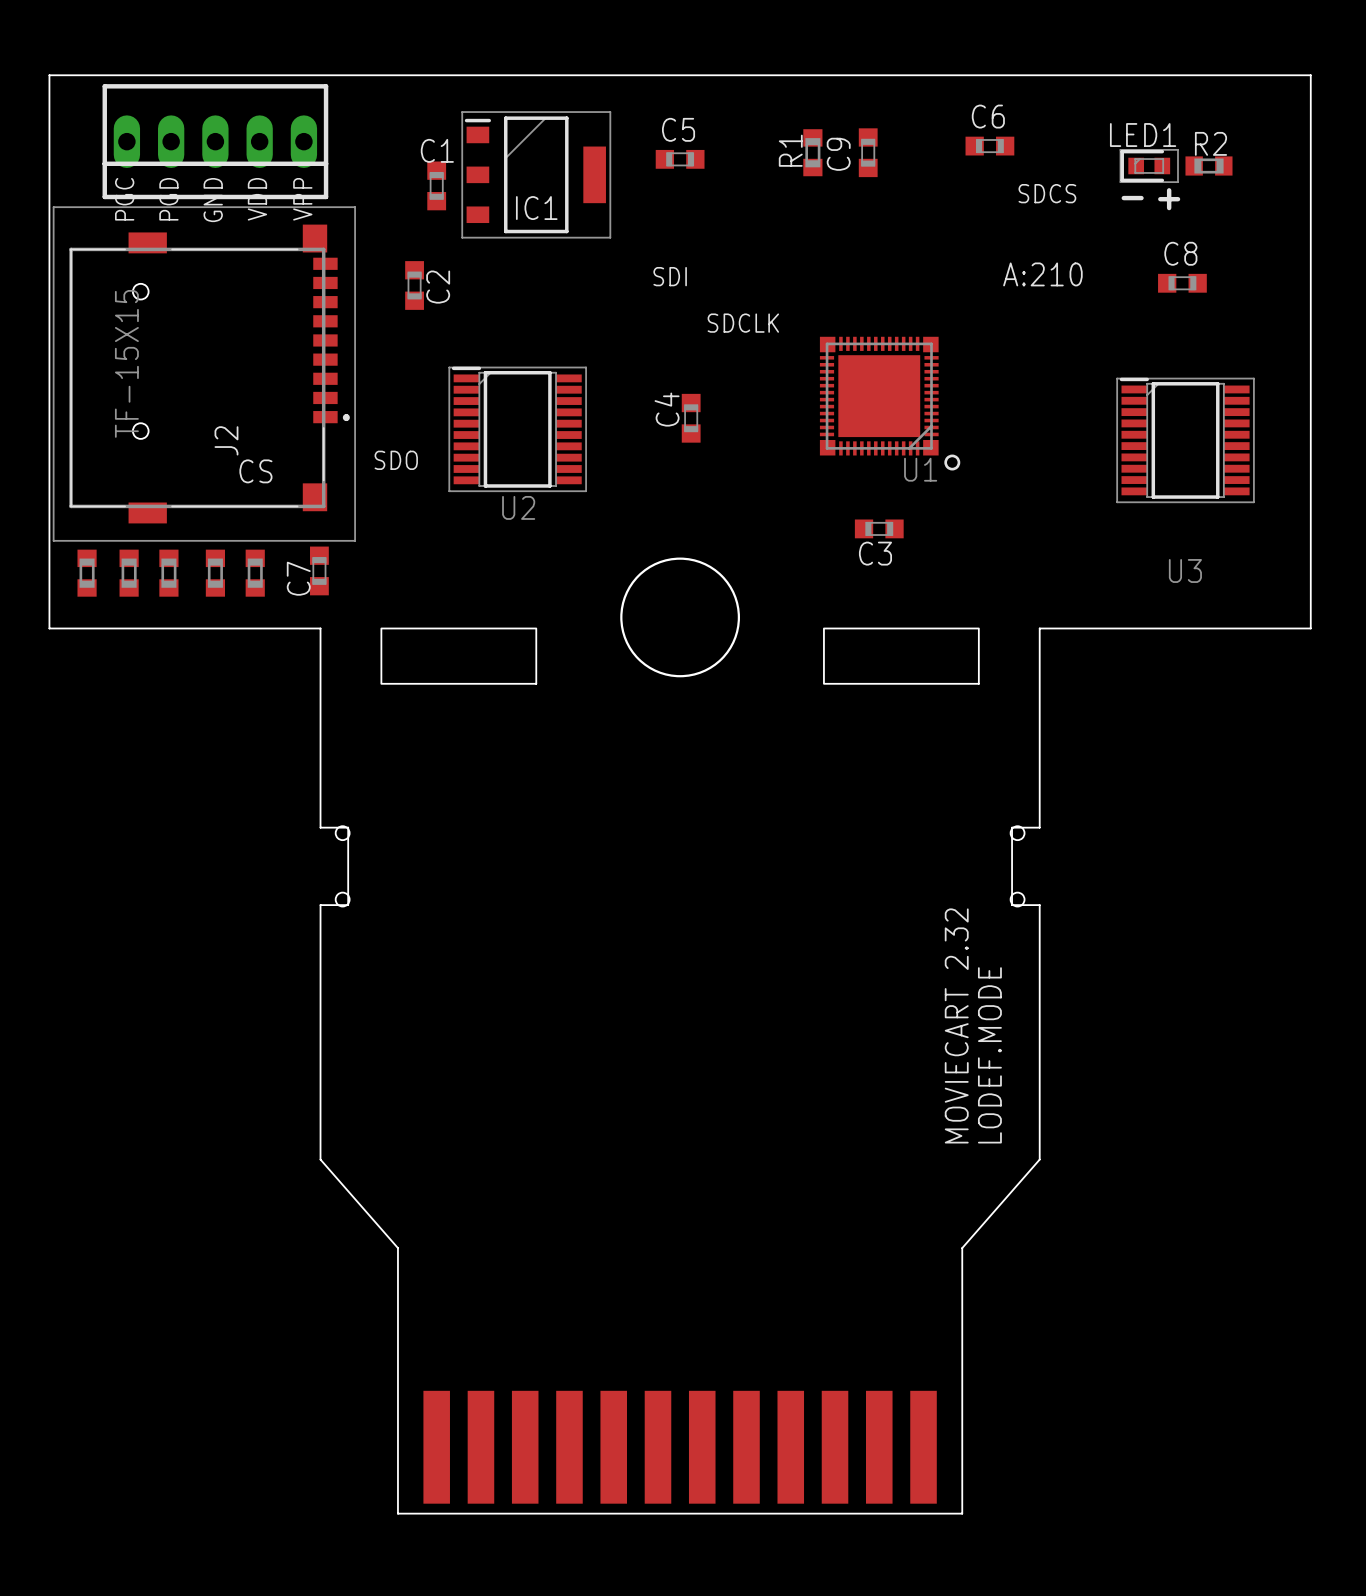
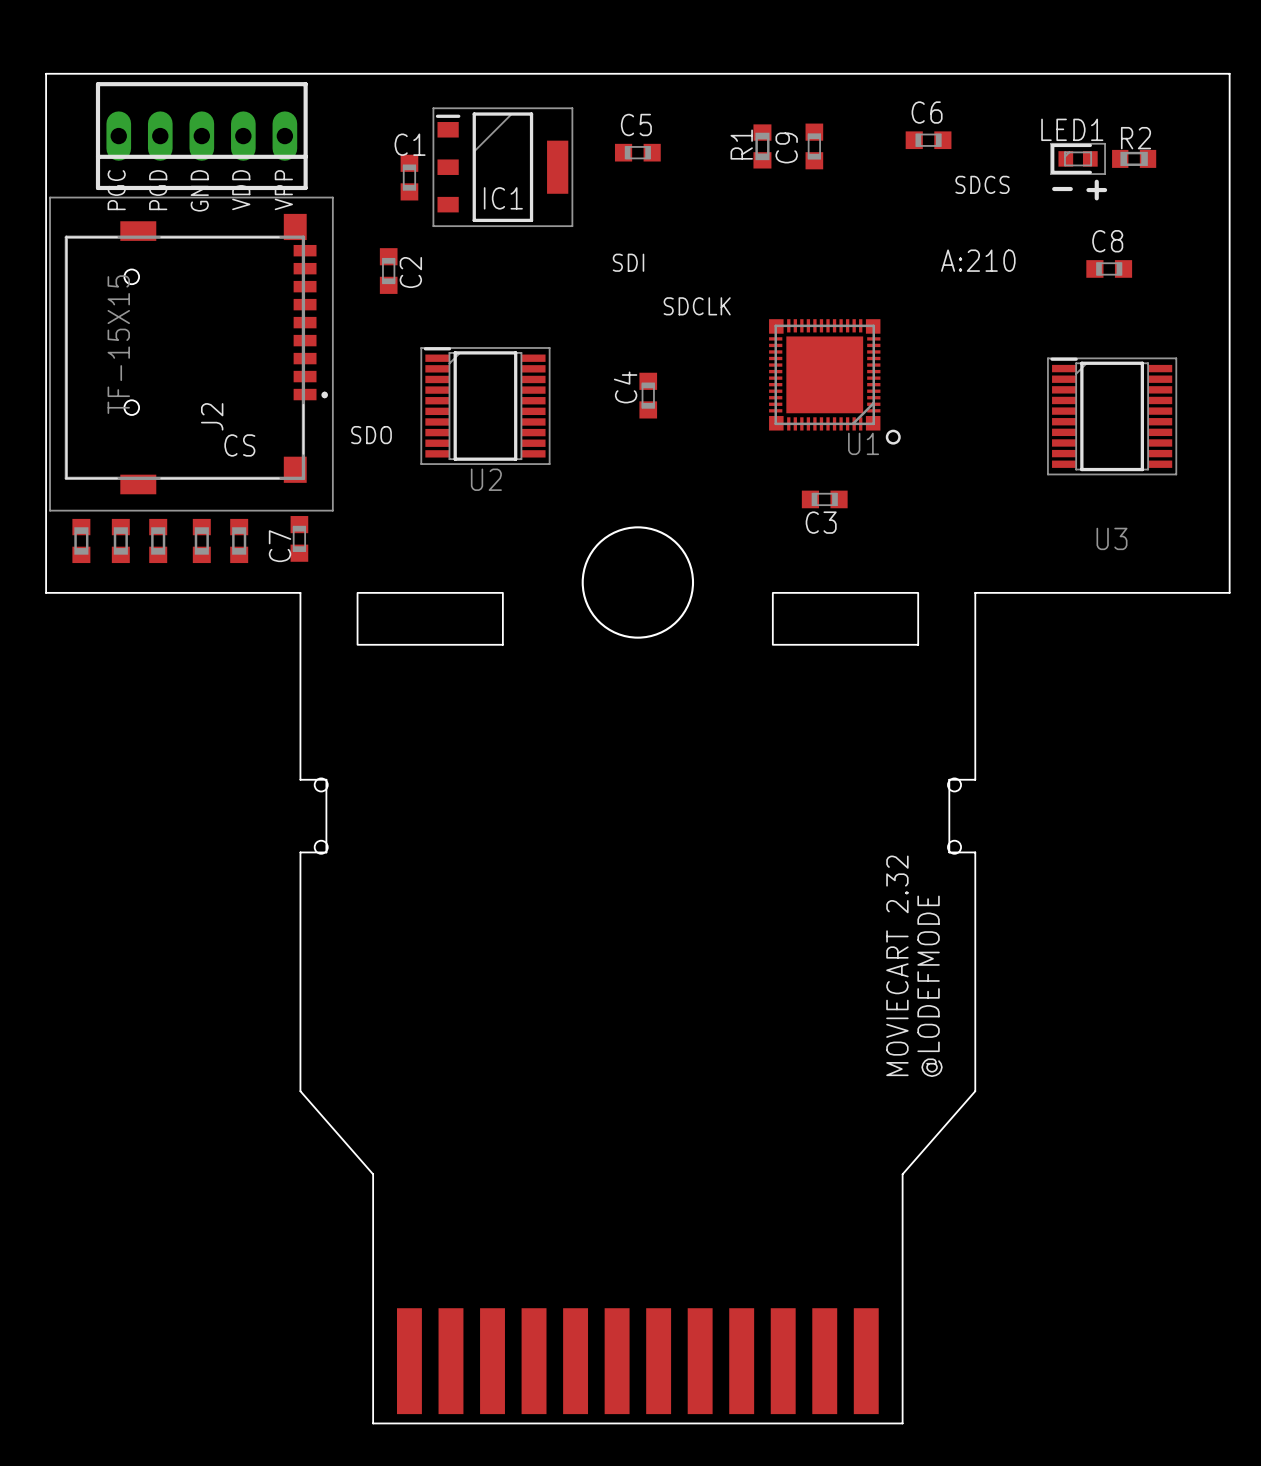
text: LODEF.MODE (989, 1055) -> @LODEFMODE (930, 986)

